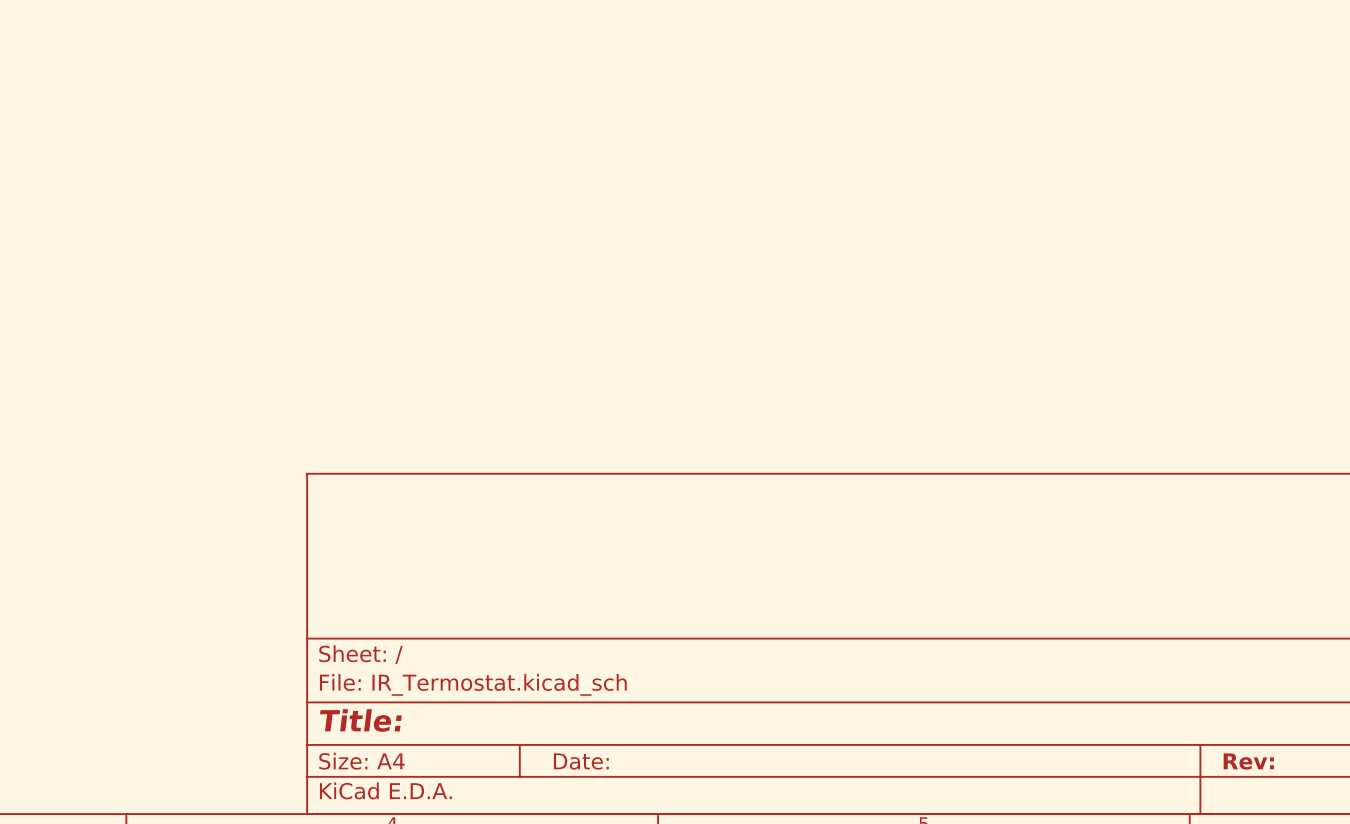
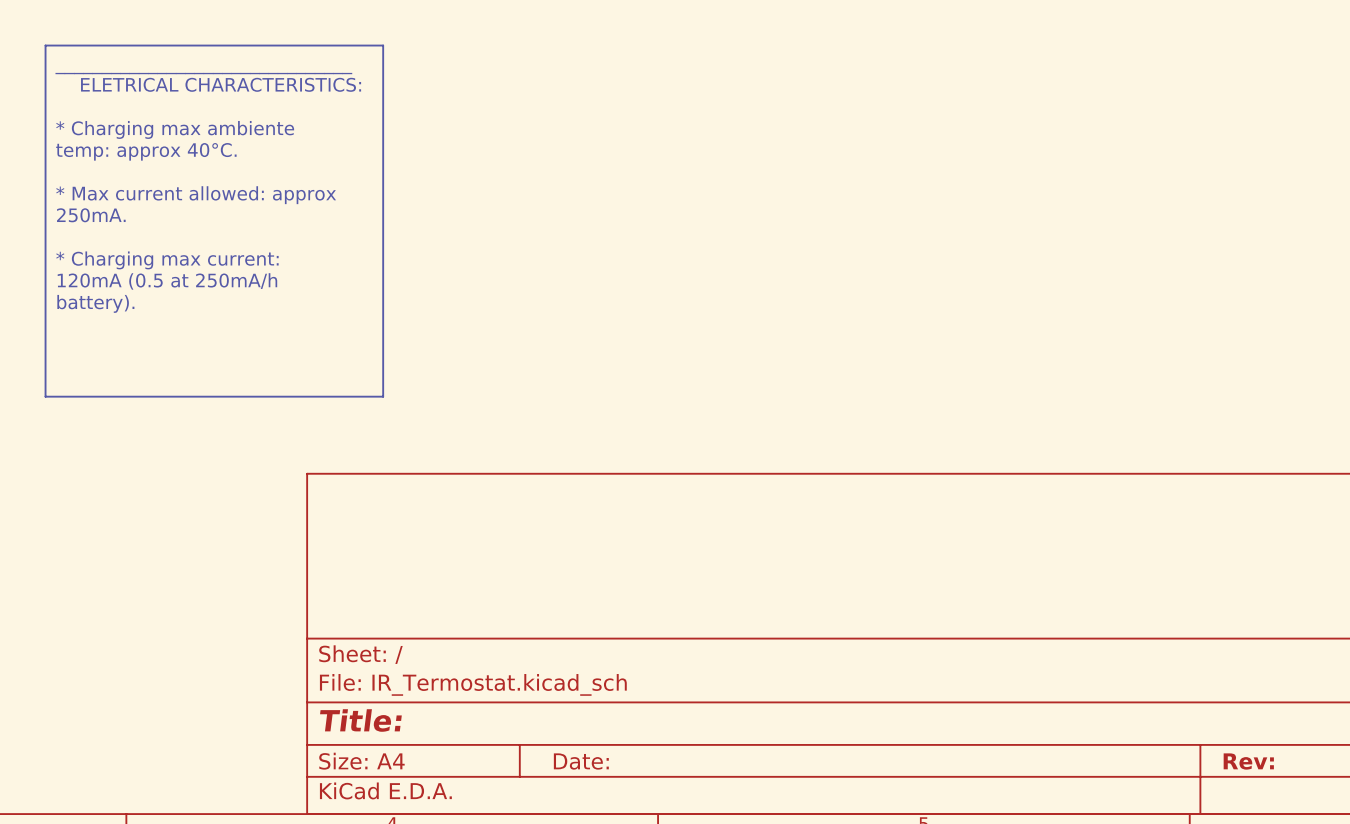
line: none -> (45, 45) (383, 45) (383, 396) (45, 396) (45, 45)
text: none -> ________________________________ (203, 73)
text: none -> ELETRICAL CHARACTERISTICS: (221, 84)
text: none -> * Charging max ambiente (175, 129)
text: none -> temp: approx 40°C. (146, 151)
text: none -> * Max current allowed: approx (196, 195)
text: none -> 250mA. (91, 215)
text: none -> * Charging max current: (167, 260)
text: none -> 120mA (0.5 at 250mA/h (167, 281)
text: none -> battery). (95, 303)

